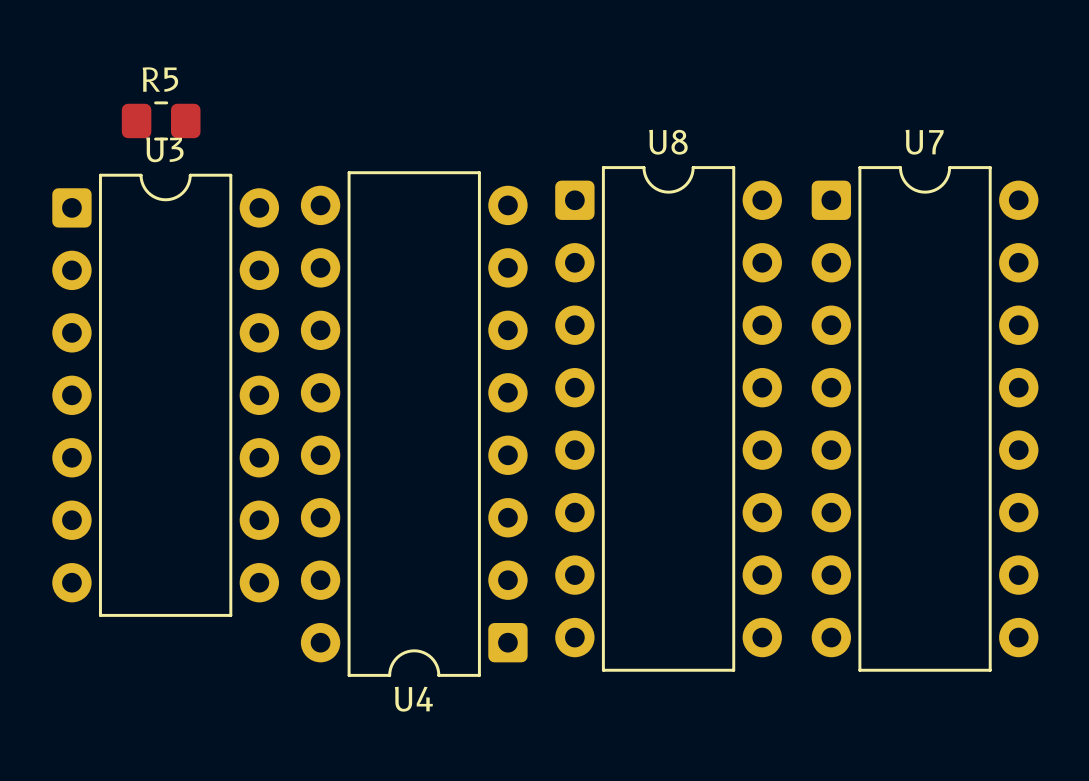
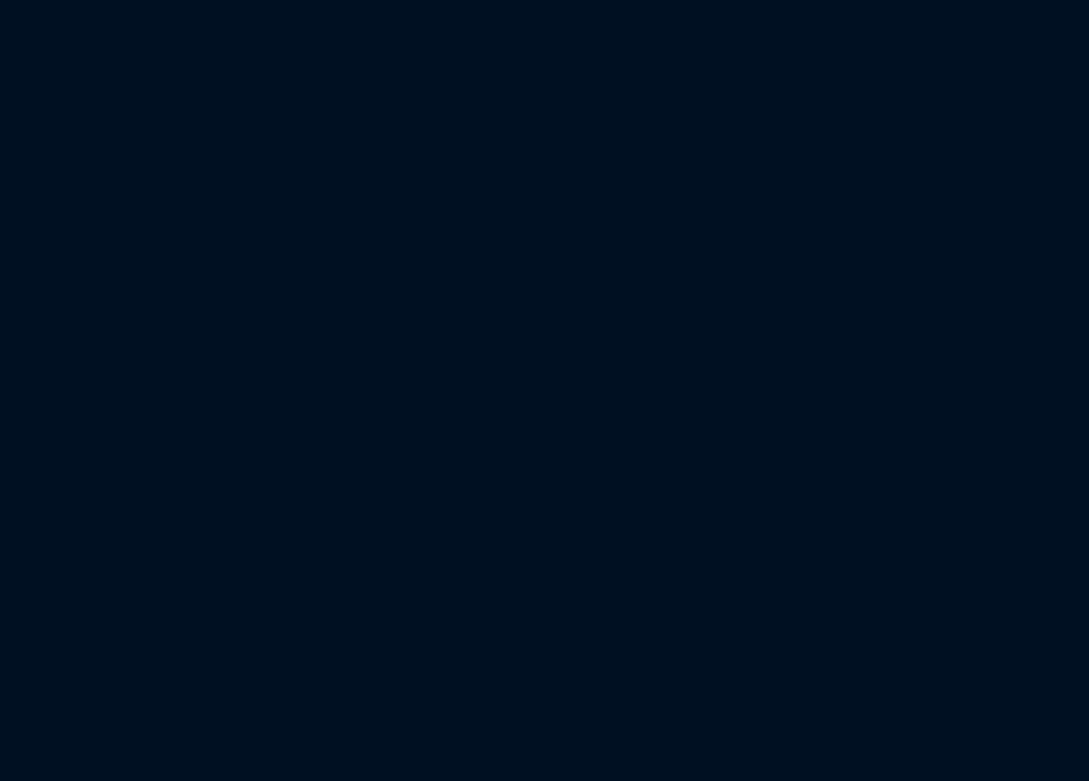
R5: (161, 120) -> none
U3: (165, 395) -> none
U8: (668, 418) -> none
U7: (925, 418) -> none
U4: (414, 424) -> none

